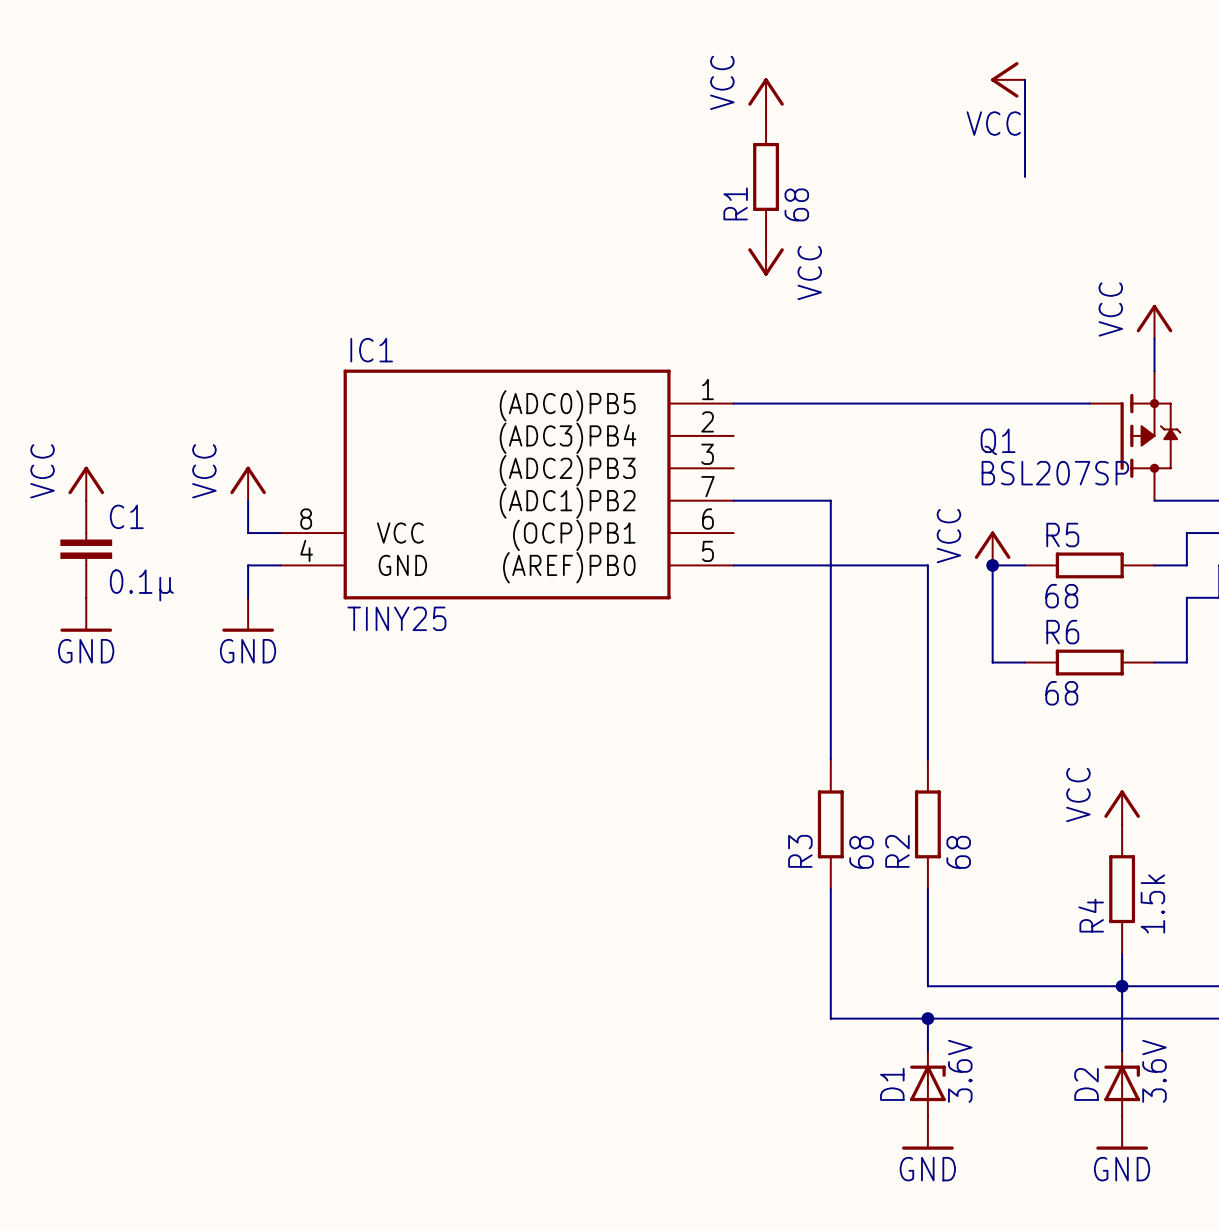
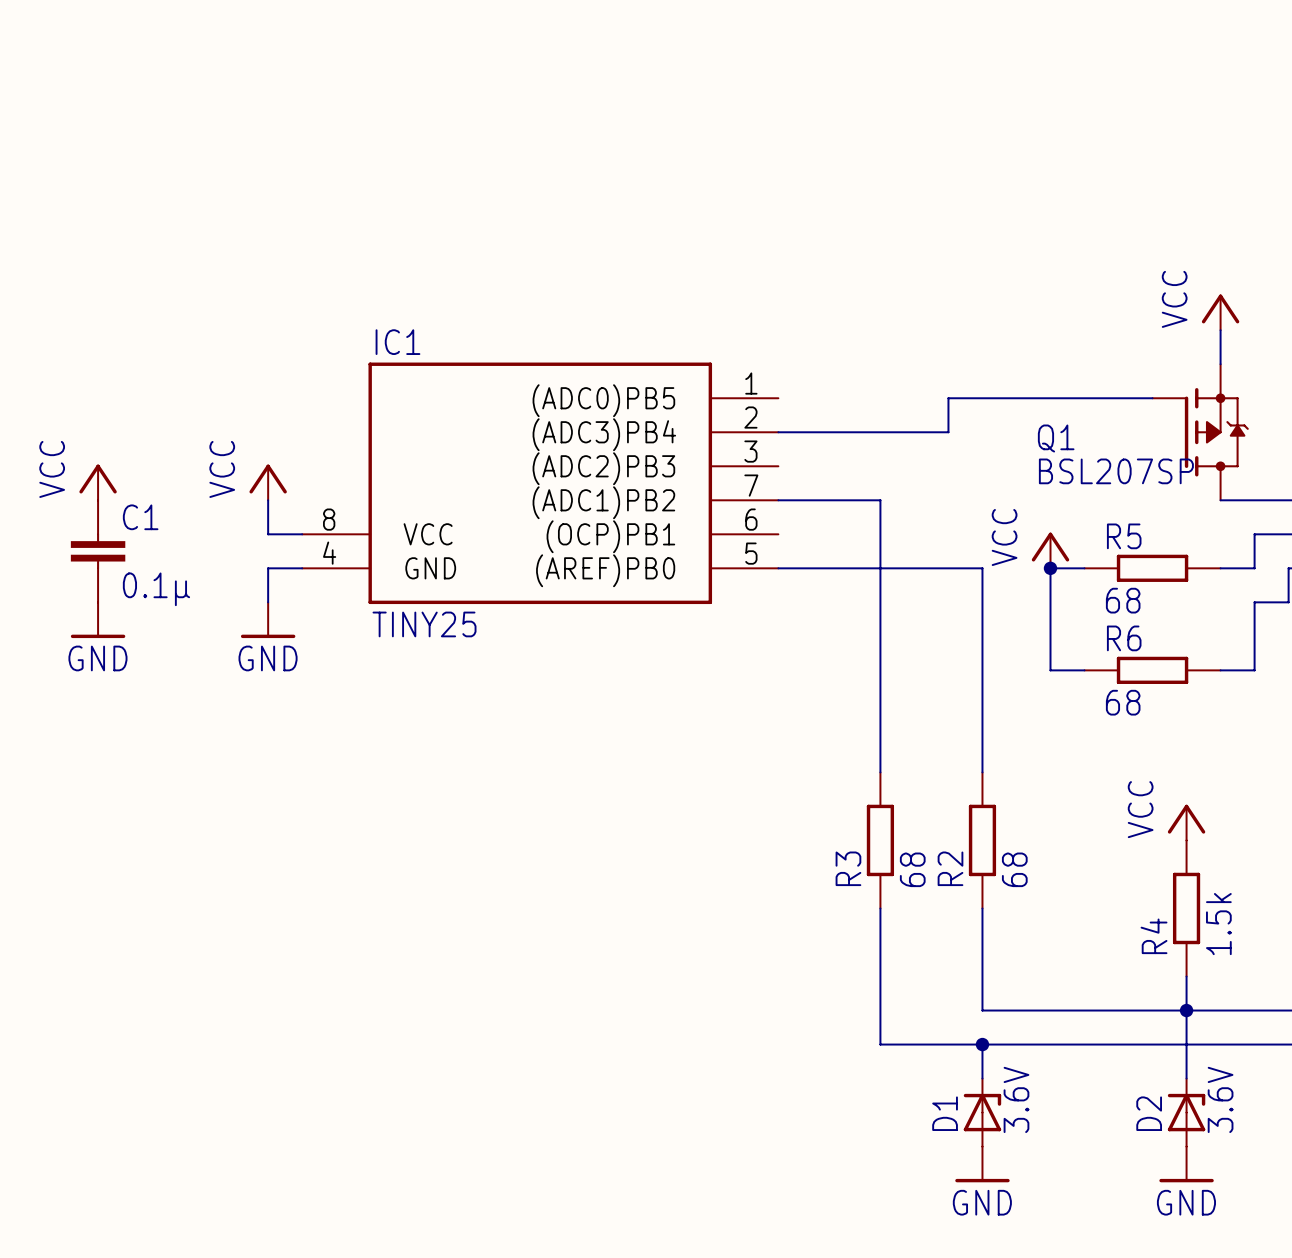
power symbol: VCC (1008, 79) -> none
wire: (1025, 79) (1025, 176) -> none
power symbol: VCC (766, 95) -> none
R1: 68 (766, 176) -> none
power symbol: VCC (766, 258) -> none
wire: (733, 403) (895, 403) -> (778, 432) (948, 432) (948, 398)

